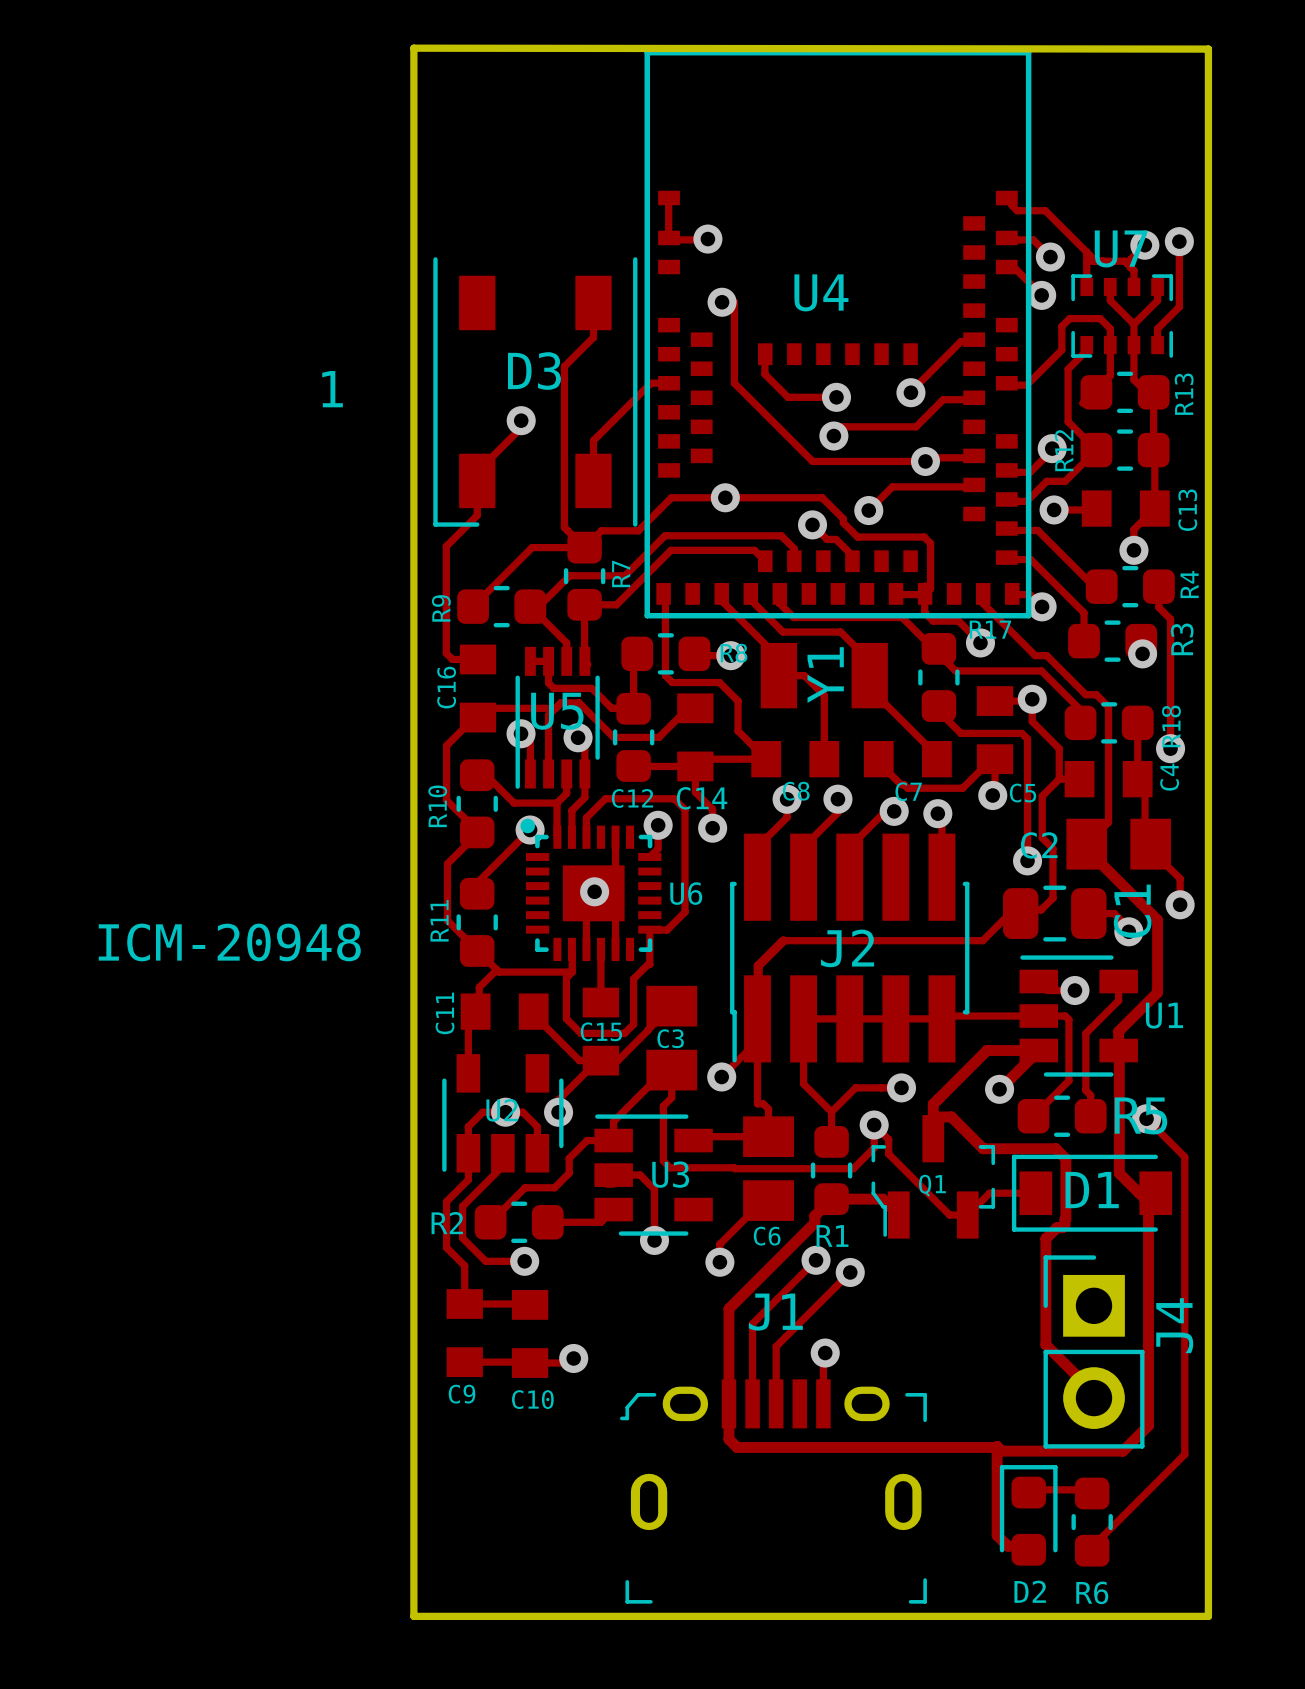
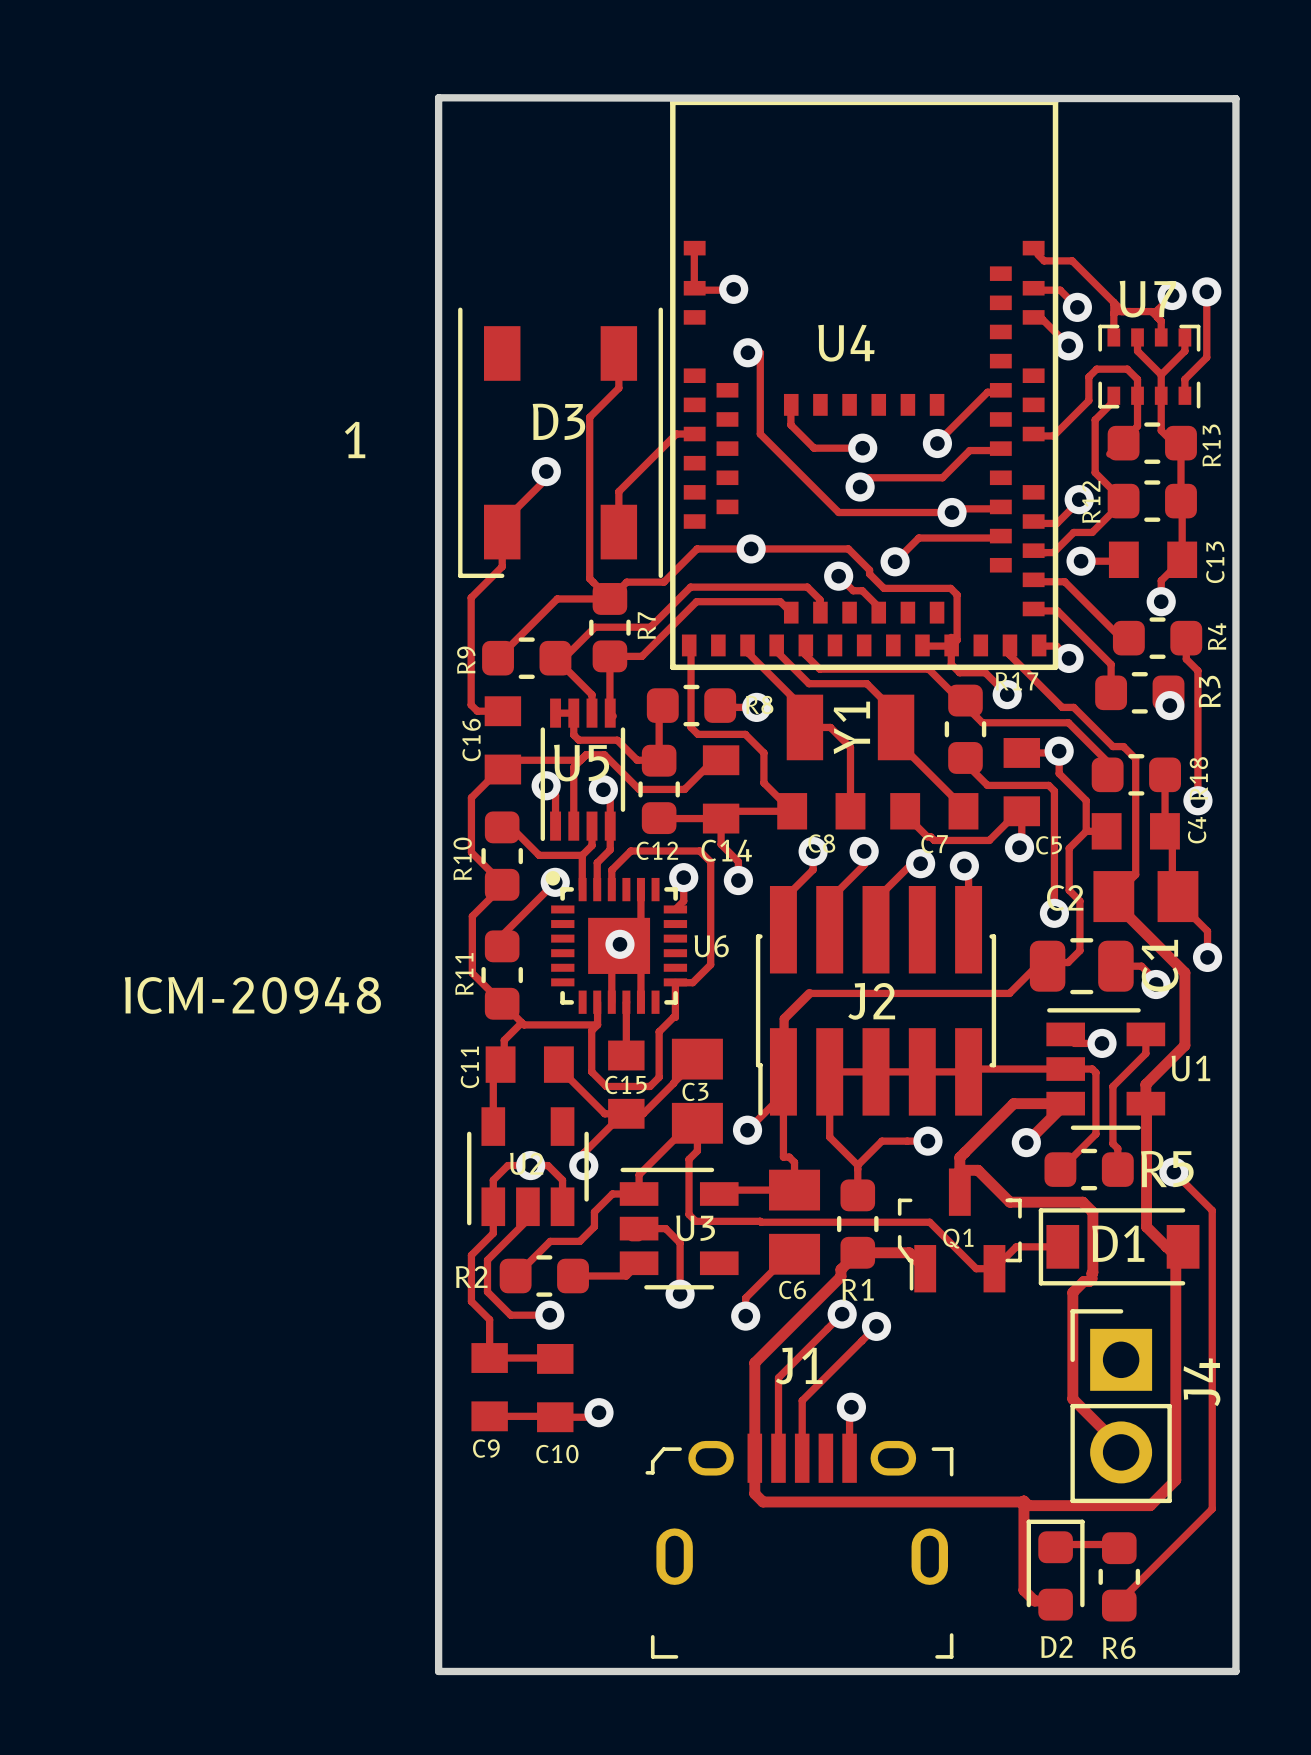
track: (874, 1125) (888, 1139) (888, 1154) (903, 1168) -> (879, 1222) (929, 1222)
track: (874, 1125) (874, 1147) (853, 1168) -> none
via: (874, 1125) -> none

